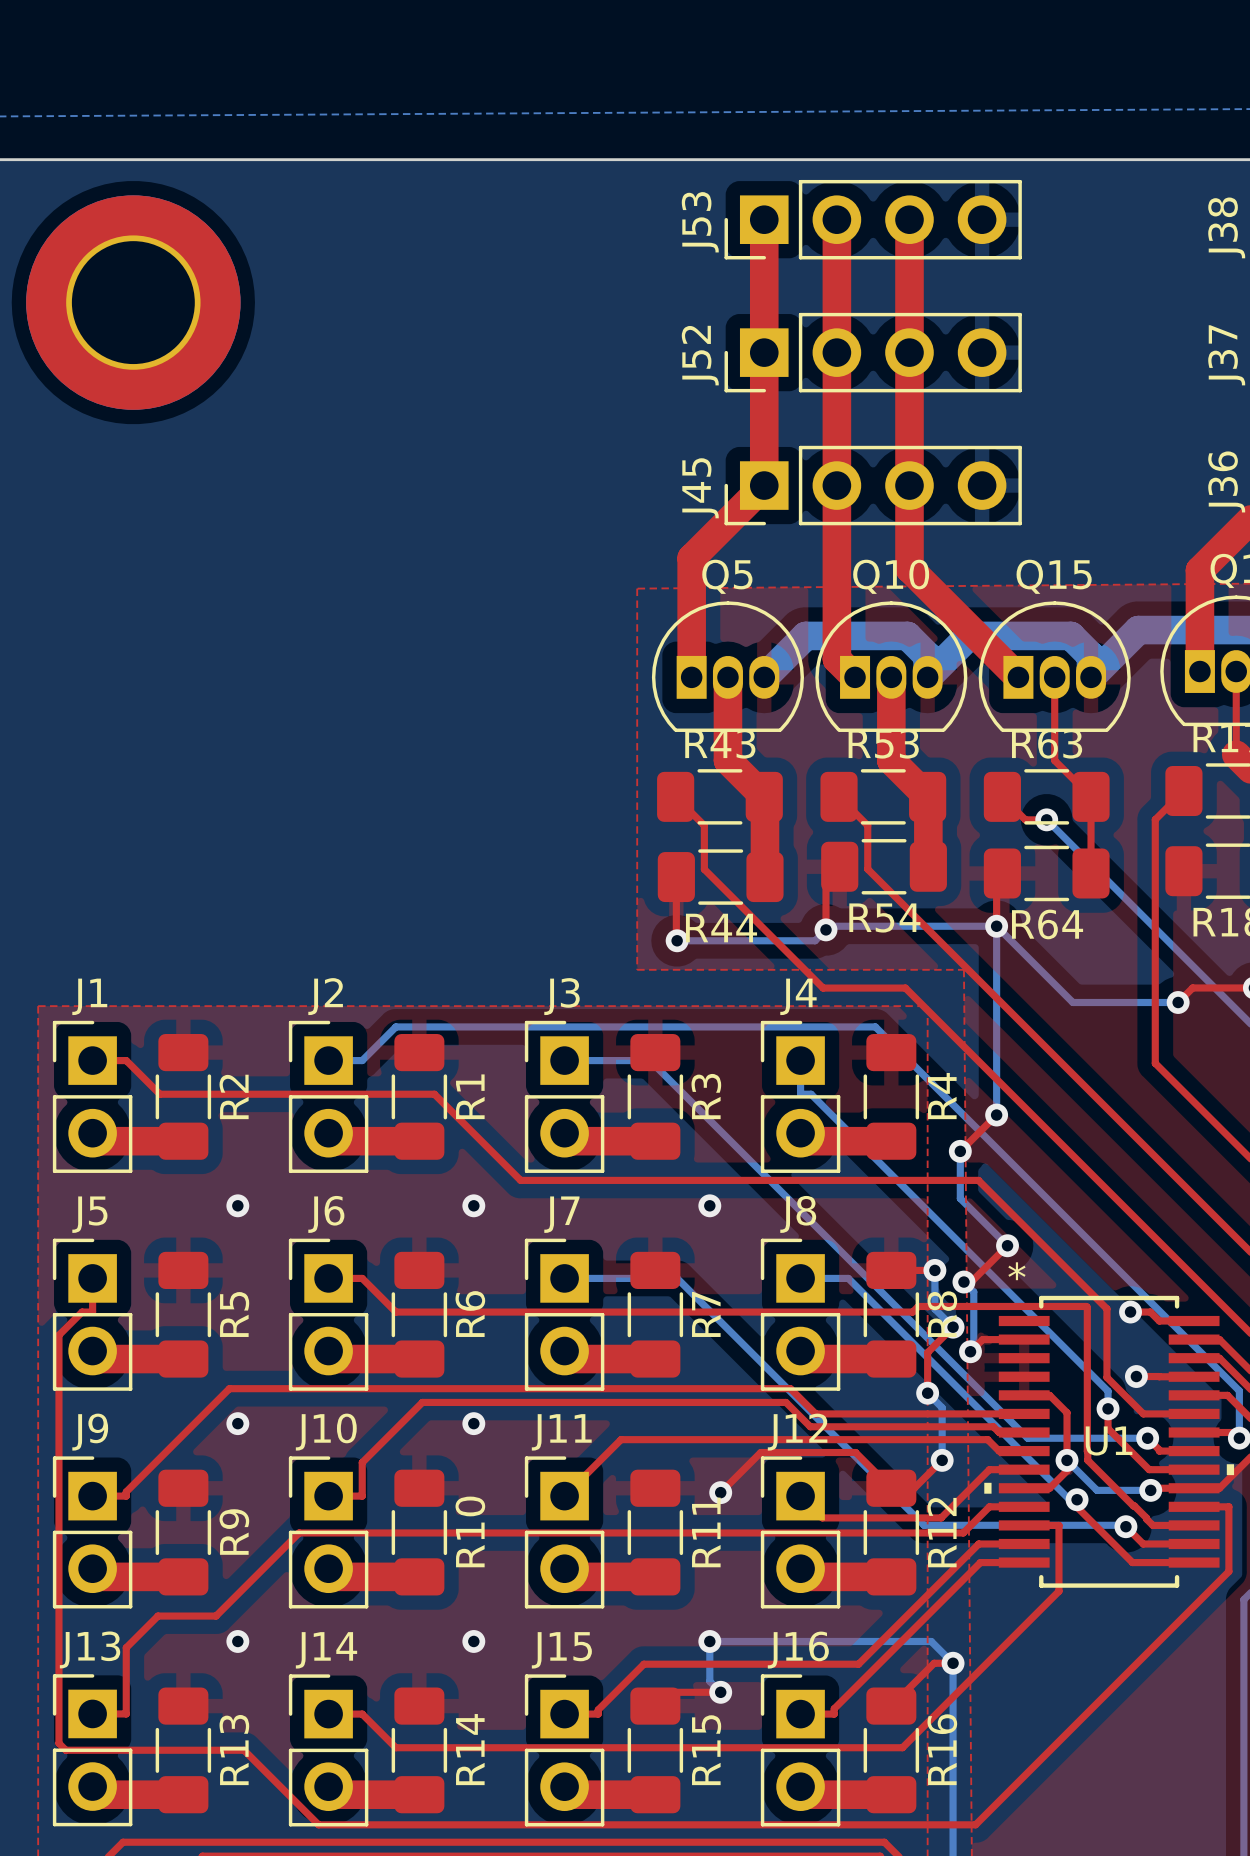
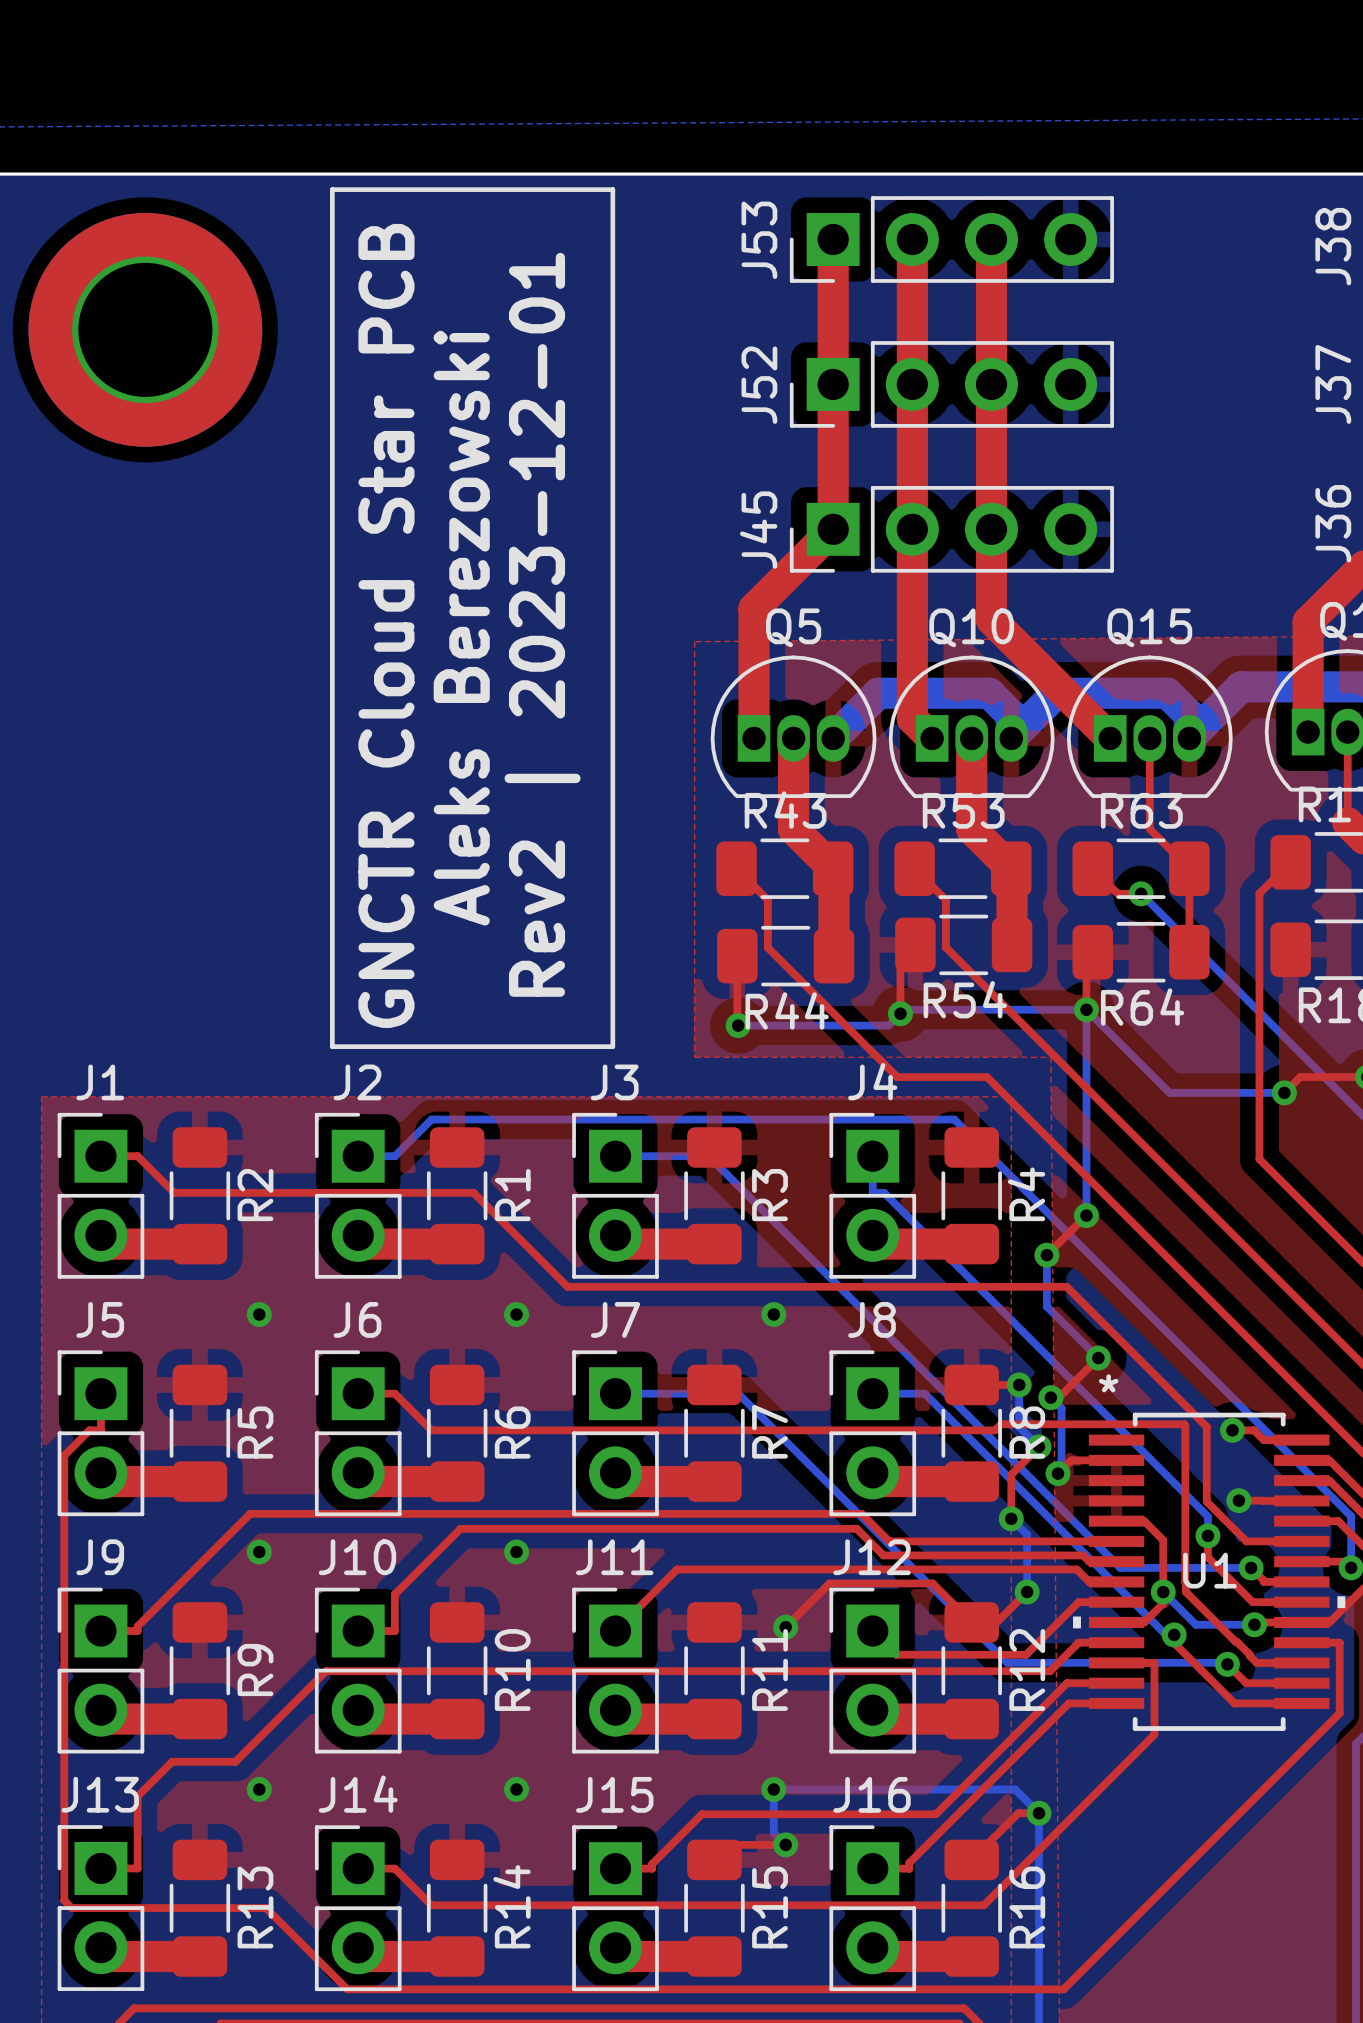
line: none -> (332, 189) (612, 189) (612, 1046) (332, 1046) (332, 189)
text: none -> Rev2 | 2023-12-01 (542, 624)
text: none -> GNCTR Cloud Star PCB (386, 625)
text: none -> Aleks Berezowski (461, 628)

